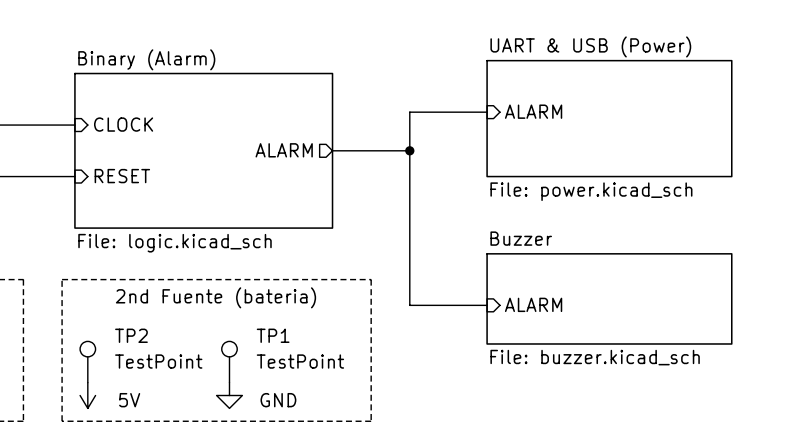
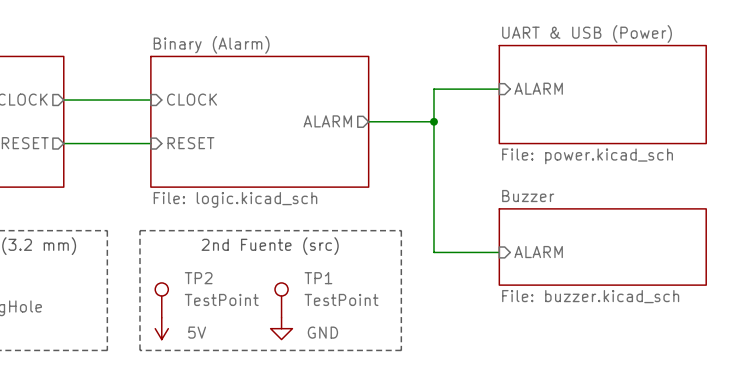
text: 2nd Fuente (bateria) (216, 297) -> 2nd Fuente (src) (270, 246)

